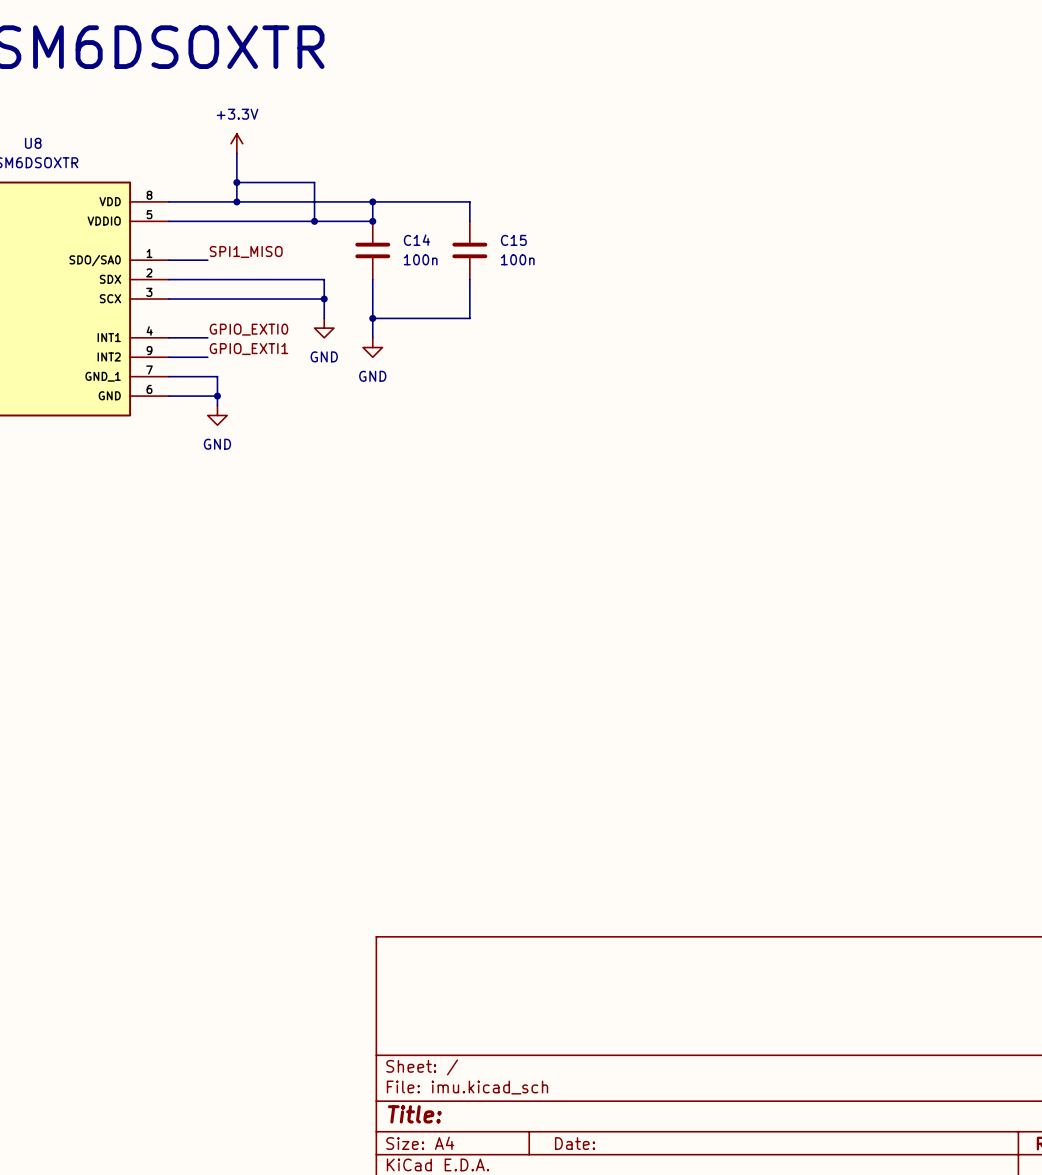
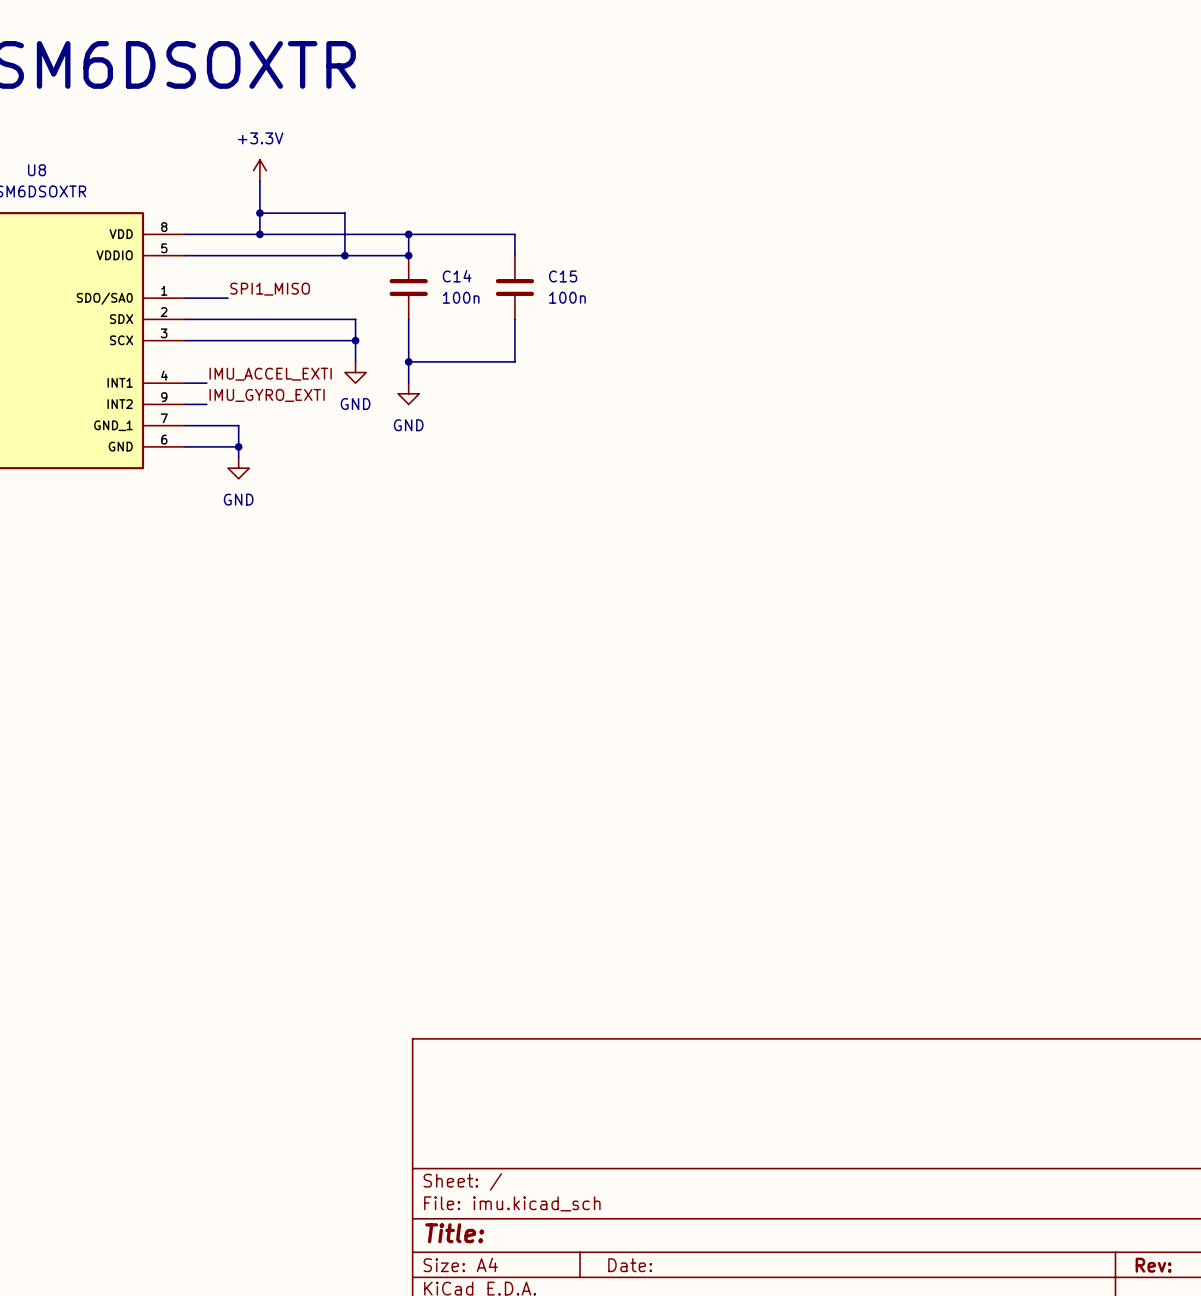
label: none -> IMU_ACCEL_EXTI (270, 374)
label: GPIO_EXTI0 (248, 329) -> none
wire: (188, 337) (207, 337) -> none
label: none -> IMU_GYRO_EXTI (267, 395)
label: GPIO_EXTI1 (248, 349) -> none
wire: (188, 357) (207, 357) -> none

